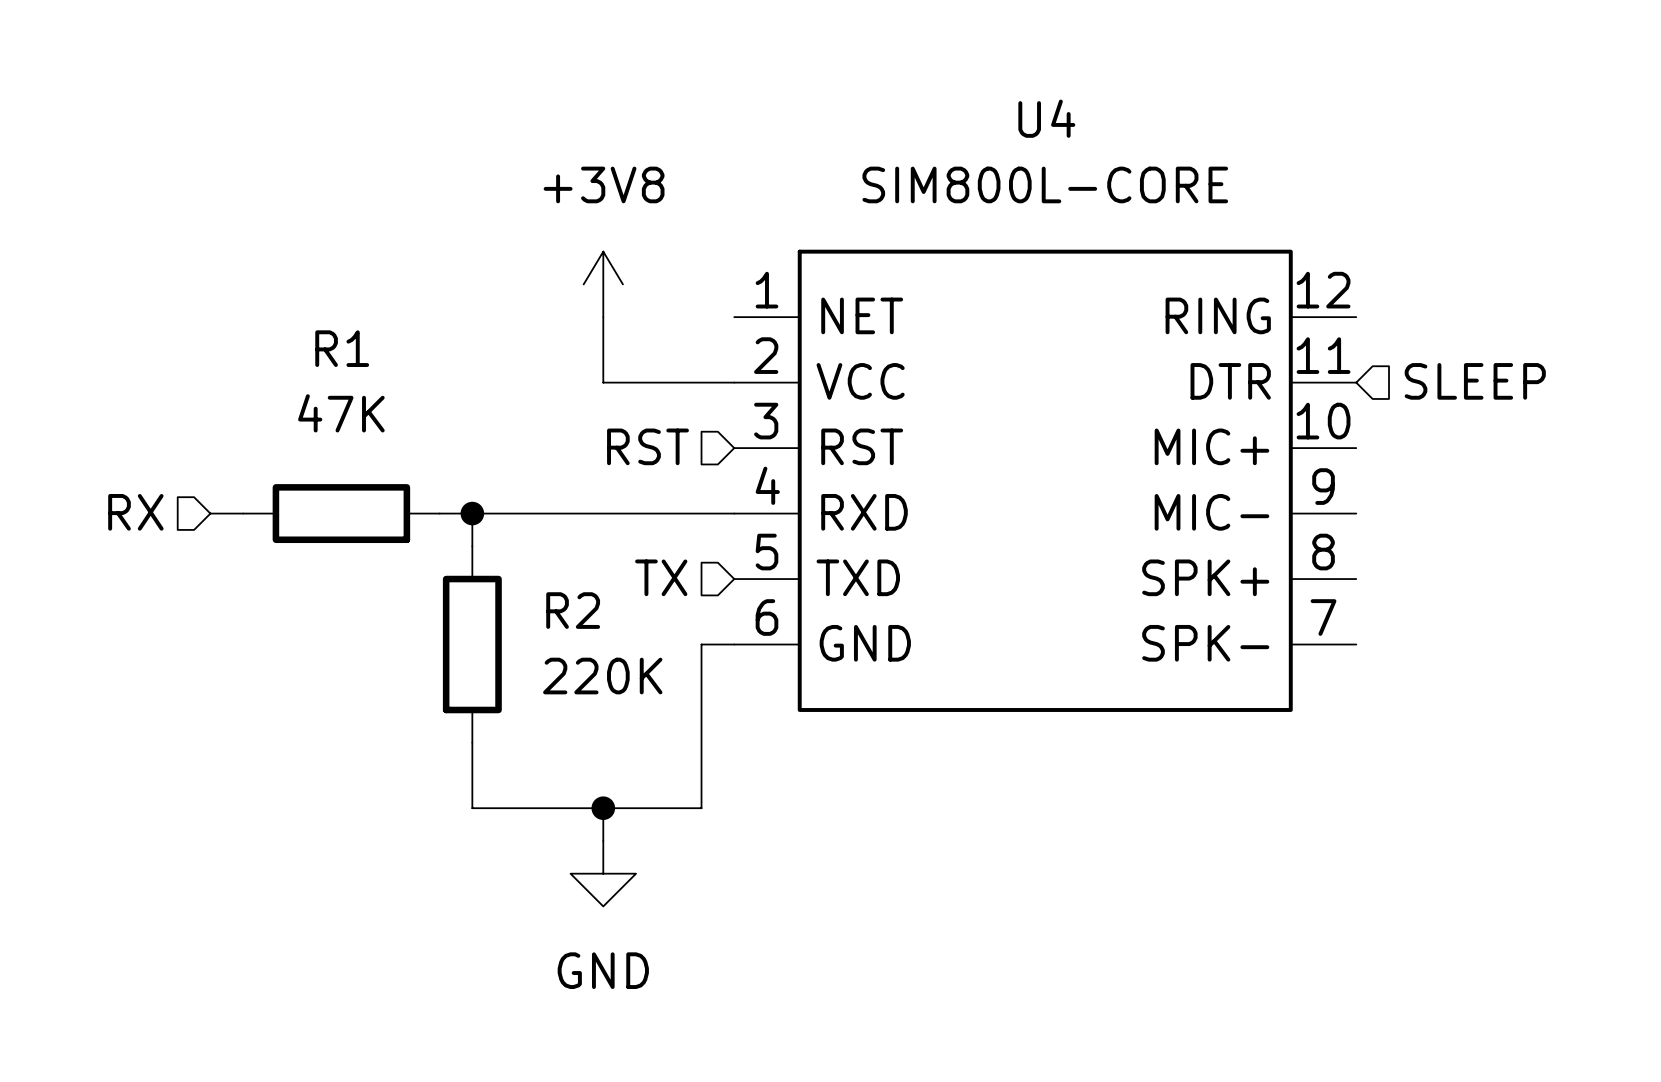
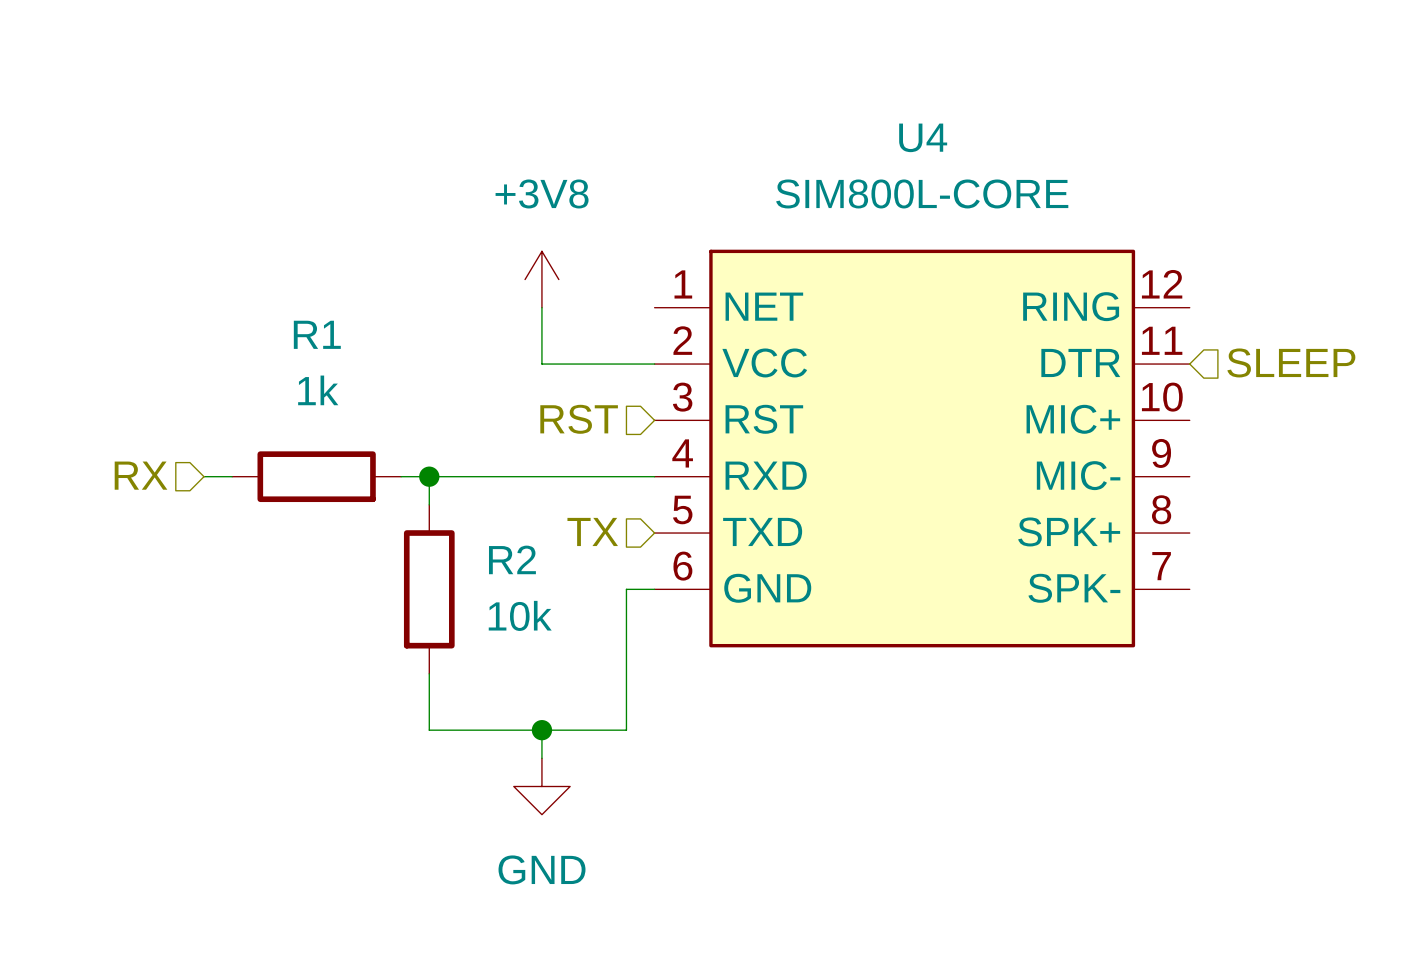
R1 value: 47K (341, 413) -> 1k (318, 390)
R2 value: 220K (602, 676) -> 10k (520, 615)

